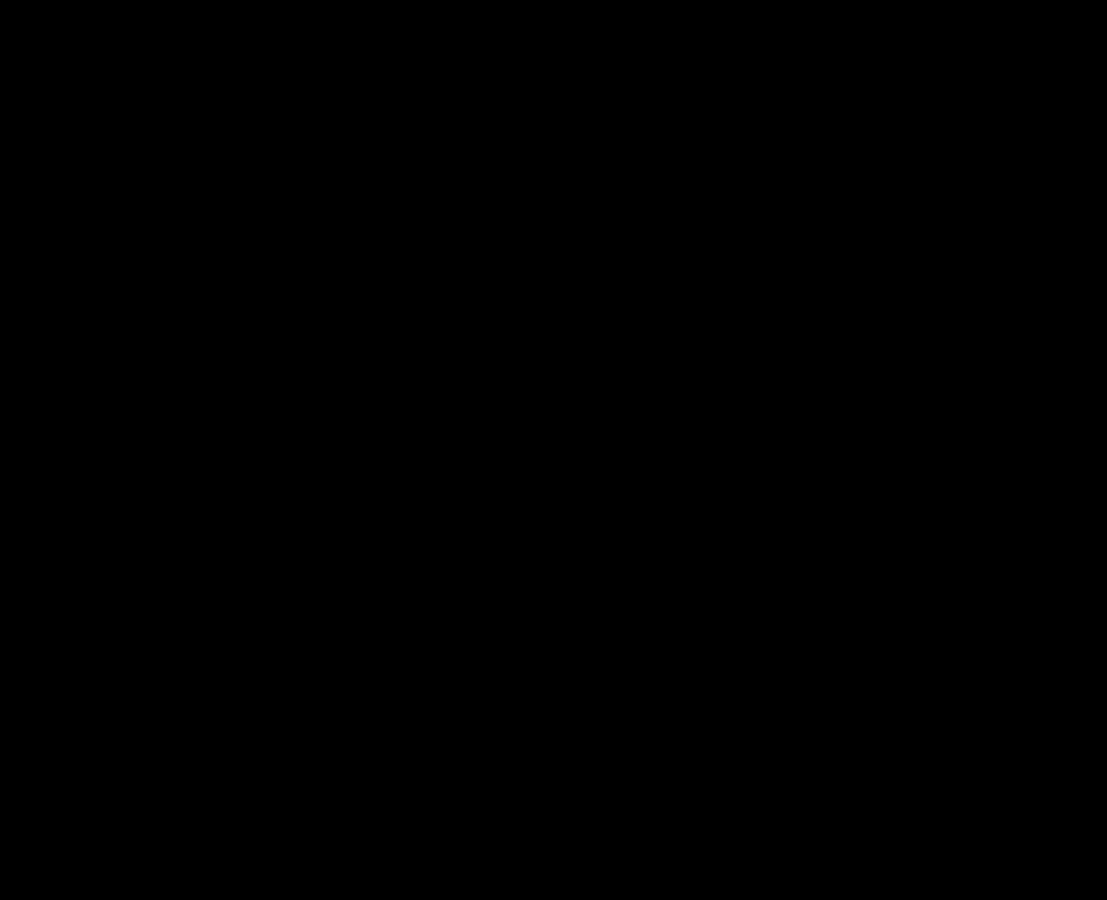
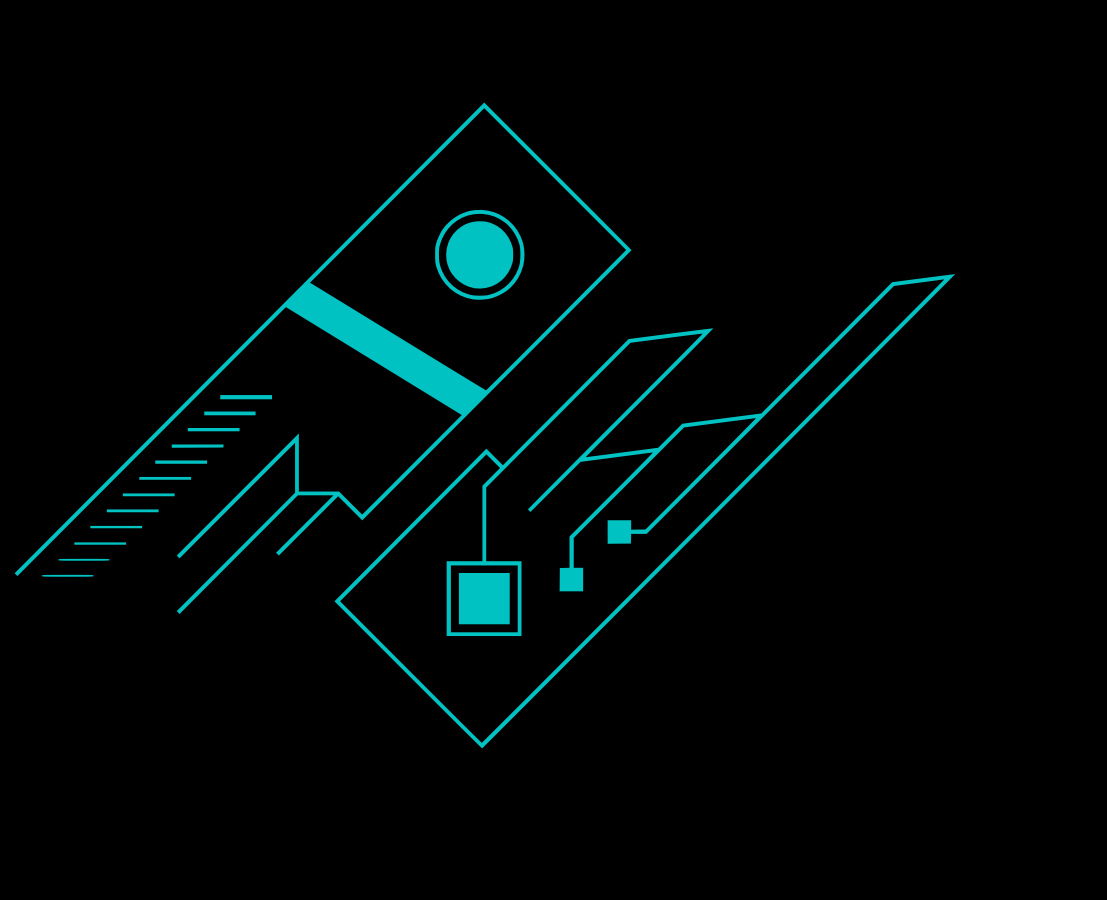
drawing: none -> [14, 102, 956, 749]

